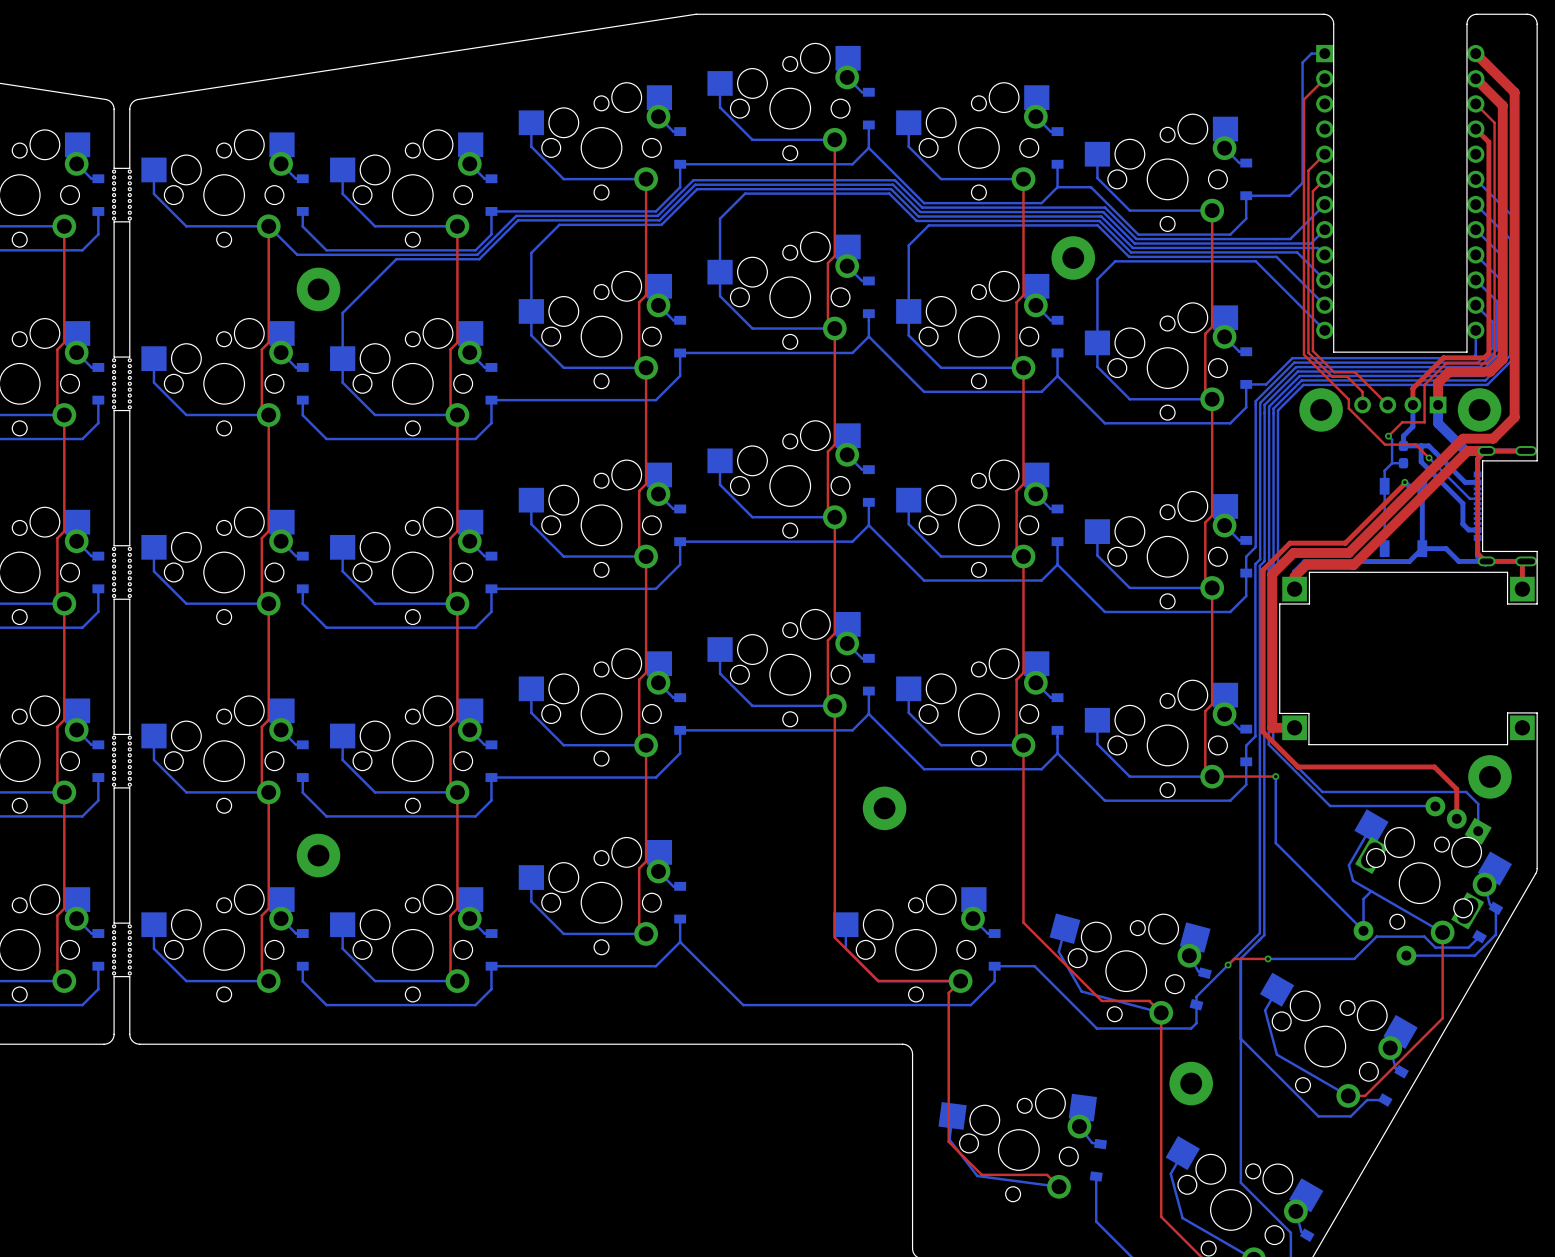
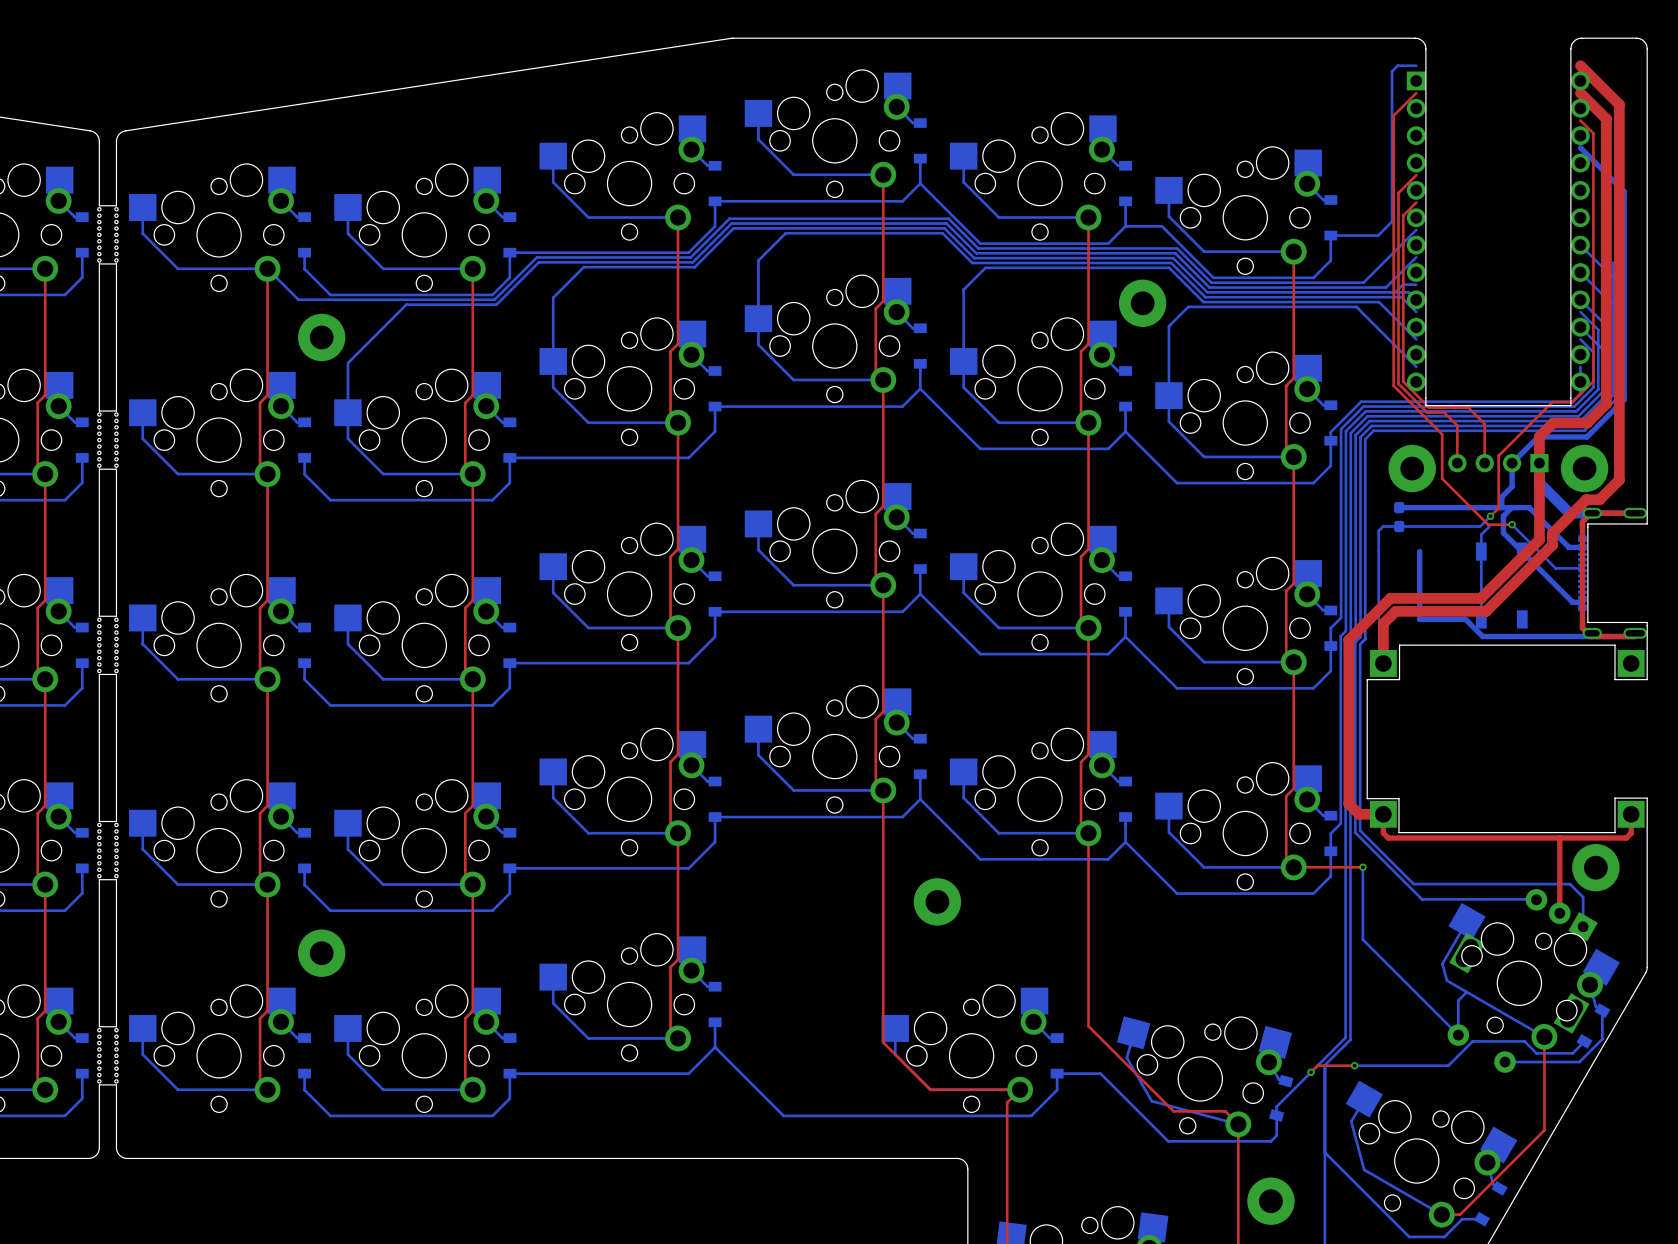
bottom track: (1324, 53) (1311, 53) (1302, 62) -> (1416, 65) (1397, 65) (1392, 71) (1392, 90)
top track: (1475, 53) (1514, 92) (1514, 417) (1511, 420) -> (1580, 65) (1619, 104) (1619, 480)
top track: none -> (1416, 93) (1393, 115) (1393, 385) (1442, 434) (1442, 478) (1488, 524) (1512, 524)
top track: (1324, 78) (1303, 99) (1303, 354) (1348, 399) (1348, 408) (1385, 444) (1415, 444) (1429, 457) -> none
top track: (1475, 78) (1502, 105) (1502, 359) (1490, 371) (1449, 371) (1438, 382) -> (1580, 93) (1606, 119) (1606, 403) (1587, 423) (1553, 423) (1539, 436) (1539, 439)
top track: none -> (1580, 120) (1593, 133) (1593, 381) (1572, 402) (1552, 402) (1498, 455) (1498, 508) (1490, 516)
top track: (1475, 103) (1494, 122) (1494, 355) (1486, 363) (1445, 363) (1424, 384) (1424, 422) (1402, 422) (1388, 436) -> none
bottom track: none -> (1580, 147) (1624, 191) (1624, 399) (1586, 436) (1538, 436) (1512, 463)
top track: (1475, 129) (1488, 142) (1488, 353) (1484, 357) (1443, 357) (1412, 388) (1412, 404) -> none
top track: (1324, 154) (1308, 170) (1308, 352) (1332, 376) (1347, 376) (1362, 391) -> (1416, 175) (1398, 192) (1398, 383) (1427, 412) (1444, 412) (1457, 425) (1457, 449)
top track: (1324, 179) (1312, 191) (1312, 350) (1334, 372) (1355, 372) (1387, 404) -> (1416, 202) (1403, 215) (1403, 381) (1429, 407) (1468, 407) (1484, 423) (1484, 463)
bottom track: (1475, 179) (1514, 218) (1514, 357) (1487, 384) (1303, 384) (1277, 410) -> (1617, 397) (1584, 430) (1373, 430) (1365, 439) (1365, 469)
bottom track: (1324, 204) (1290, 239) (1276, 239) -> (1416, 229) (1363, 282)
bottom track: (1324, 229) (1310, 243) (1297, 243) -> (1416, 257) (1386, 287)
bottom track: none -> (1416, 284) (1402, 284) (1395, 292)
bottom track: (1297, 252) (1324, 280) -> (1386, 297) (1401, 297) (1416, 312)
bottom track: (1276, 256) (1324, 305) -> (1363, 302) (1378, 302) (1416, 339)
bottom track: (1255, 261) (1324, 330) -> (1341, 306) (1356, 306) (1416, 366)
bottom track: none -> (1580, 312) (1598, 329) (1598, 389) (1576, 411) (1365, 411) (1345, 431) (1345, 461)
bottom track: (1475, 305) (1492, 321) (1492, 348) (1478, 362) (1294, 362) (1255, 401) -> (1580, 339) (1593, 352) (1593, 387) (1574, 406) (1363, 406) (1341, 429) (1341, 459)
bottom track: (1496, 338) (1496, 350) (1479, 367) (1296, 367) (1260, 403) -> (1603, 391) (1578, 416) (1367, 416) (1350, 433) (1350, 463)
bottom track: (1501, 340) (1501, 351) (1481, 371) (1297, 371) (1264, 404) -> (1608, 393) (1580, 421) (1369, 421) (1355, 435) (1355, 465)
bottom track: (1475, 341) (1475, 354) (1472, 358) (1292, 358) (1266, 384) (1246, 384) -> (1580, 393) (1572, 401) (1361, 401) (1330, 432) (1330, 440)
bottom track: (1505, 342) (1505, 353) (1483, 375) (1299, 375) (1269, 406) -> none
bottom track: (1510, 344) (1510, 355) (1485, 380) (1301, 380) (1273, 408) -> (1613, 395) (1582, 425) (1371, 425) (1360, 437) (1360, 467)
bottom track: (1388, 436) (1392, 439) (1392, 463) (1403, 463) -> none
via: (1388, 436) -> none
top track: (1481, 438) (1463, 438) (1348, 552) (1293, 552) (1272, 574) (1272, 727) -> (1539, 463) (1539, 539) (1480, 598) (1390, 598) (1348, 640) (1348, 803) (1359, 814)
bottom track: none -> (1399, 507) (1501, 507)
bottom track: none -> (1512, 507) (1503, 516) (1503, 532) (1572, 602) (1582, 602)
bottom track: (1421, 445) (1421, 461) (1462, 503) (1462, 524) (1468, 529) (1477, 529) -> none
top track: (1486, 450) (1467, 450) (1353, 564) (1306, 564) (1294, 576) -> (1586, 499) (1552, 533) (1552, 545) (1486, 611) (1395, 611) (1383, 623) (1383, 649)
bottom track: none -> (1490, 516) (1480, 526) (1383, 526) (1378, 530) (1378, 619)
via: none -> (1490, 516)
part position: (1403, 454) -> (1399, 517)
bottom track: (1429, 457) (1469, 498) (1477, 498) (1477, 501) -> (1512, 524) (1555, 568) (1582, 568)
via: (1429, 457) -> none
via: none -> (1512, 524)
bottom track: (1404, 482) (1408, 486) (1422, 486) (1422, 548) -> none
top track: (1404, 482) (1345, 543) (1290, 543) (1262, 570) (1262, 731) (1298, 767) (1434, 767) (1456, 789) -> (1559, 838) (1559, 881)
via: (1404, 482) -> none
bottom track: none -> (1419, 551) (1419, 619) (1465, 619) (1482, 636) (1635, 636)
bottom track: (1422, 548) (1446, 548) (1458, 561) (1486, 561) -> none
bottom track: (1422, 548) (1409, 561) (1304, 561) (1294, 571) (1294, 589) (1292, 589) -> none
top track: (1477, 553) (1485, 561) (1526, 561) (1522, 565) (1522, 589) -> (1582, 624) (1582, 627) (1591, 636) (1635, 636)
top track: none -> (1383, 814) (1383, 833) (1388, 838) (1626, 838) (1631, 833) (1631, 814)

